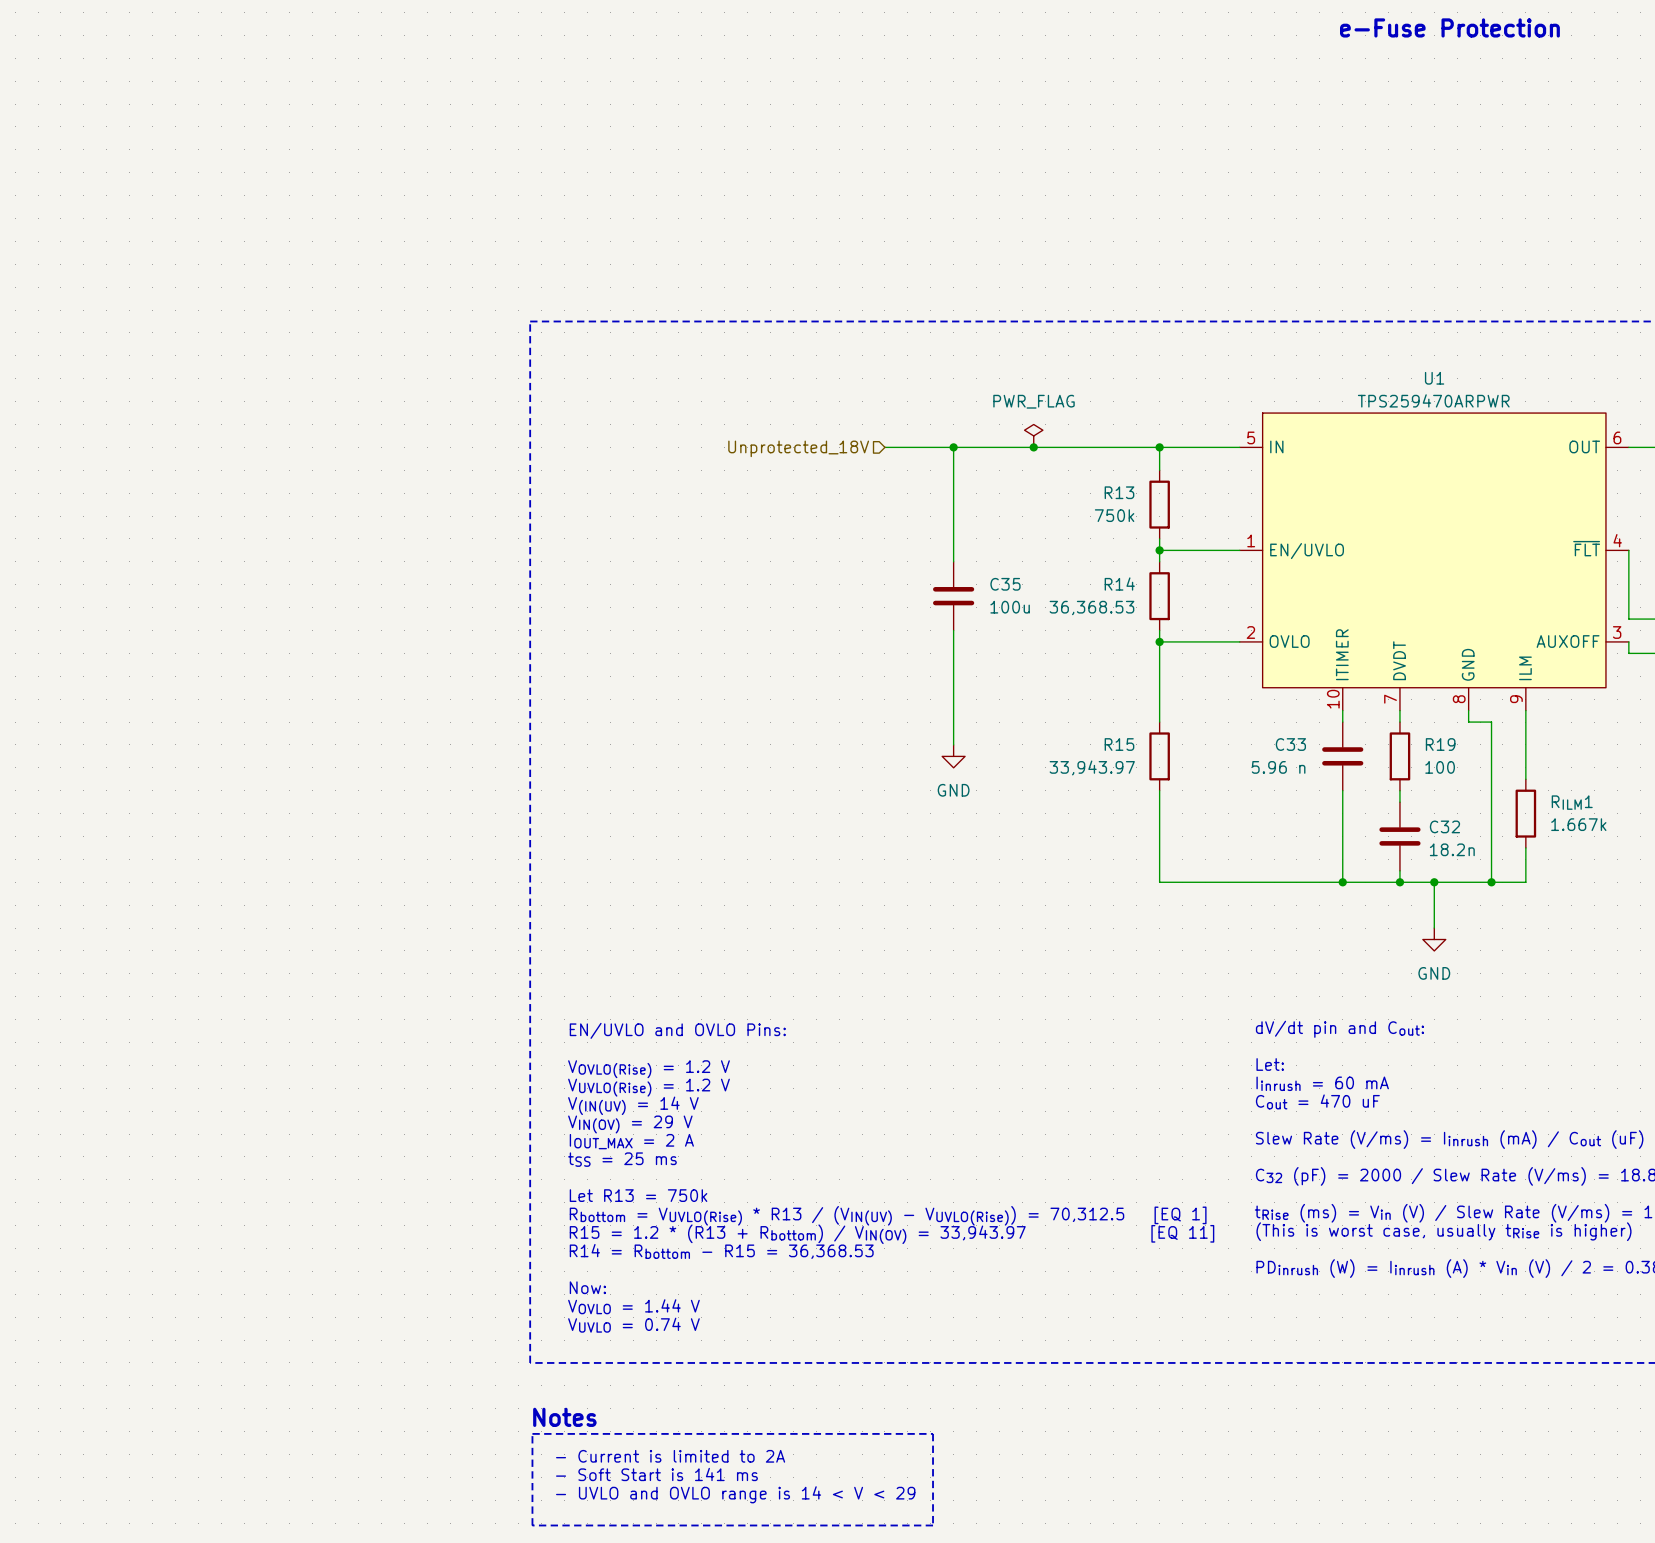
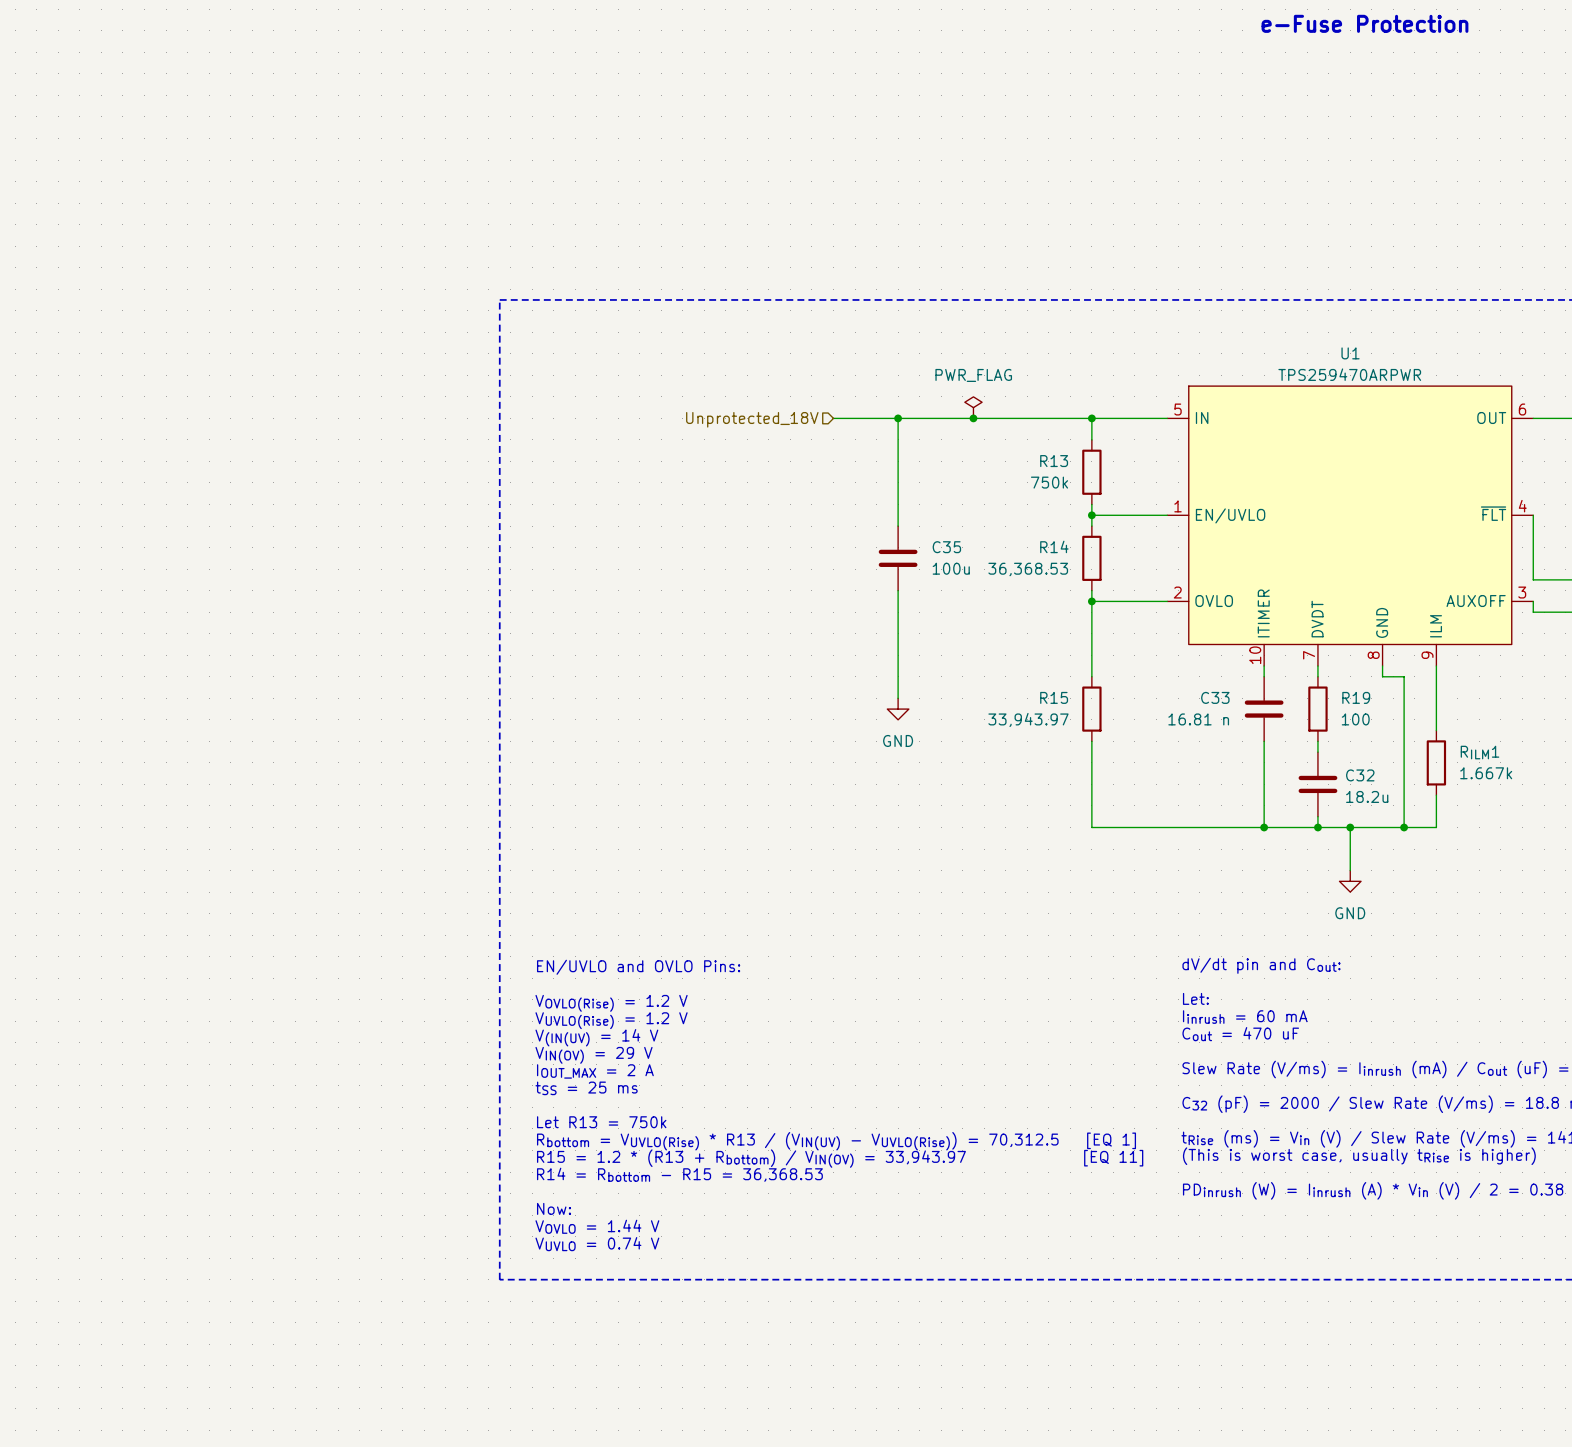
C33 value: 5.96 n (1278, 767) -> 16.81 n (1198, 719)
C32 value: 18.2n (1452, 849) -> 18.2u (1367, 796)
text: Notes (564, 1417) -> none
line: (532, 1433) (933, 1433) (933, 1525) (532, 1525) (532, 1433) -> none
text: - Current is limited to 2A (670, 1456) -> none
text: - Soft Start is 141 ms (656, 1474) -> none
text: - UVLO and OVLO range is 14 < V < 29 (735, 1494) -> none

